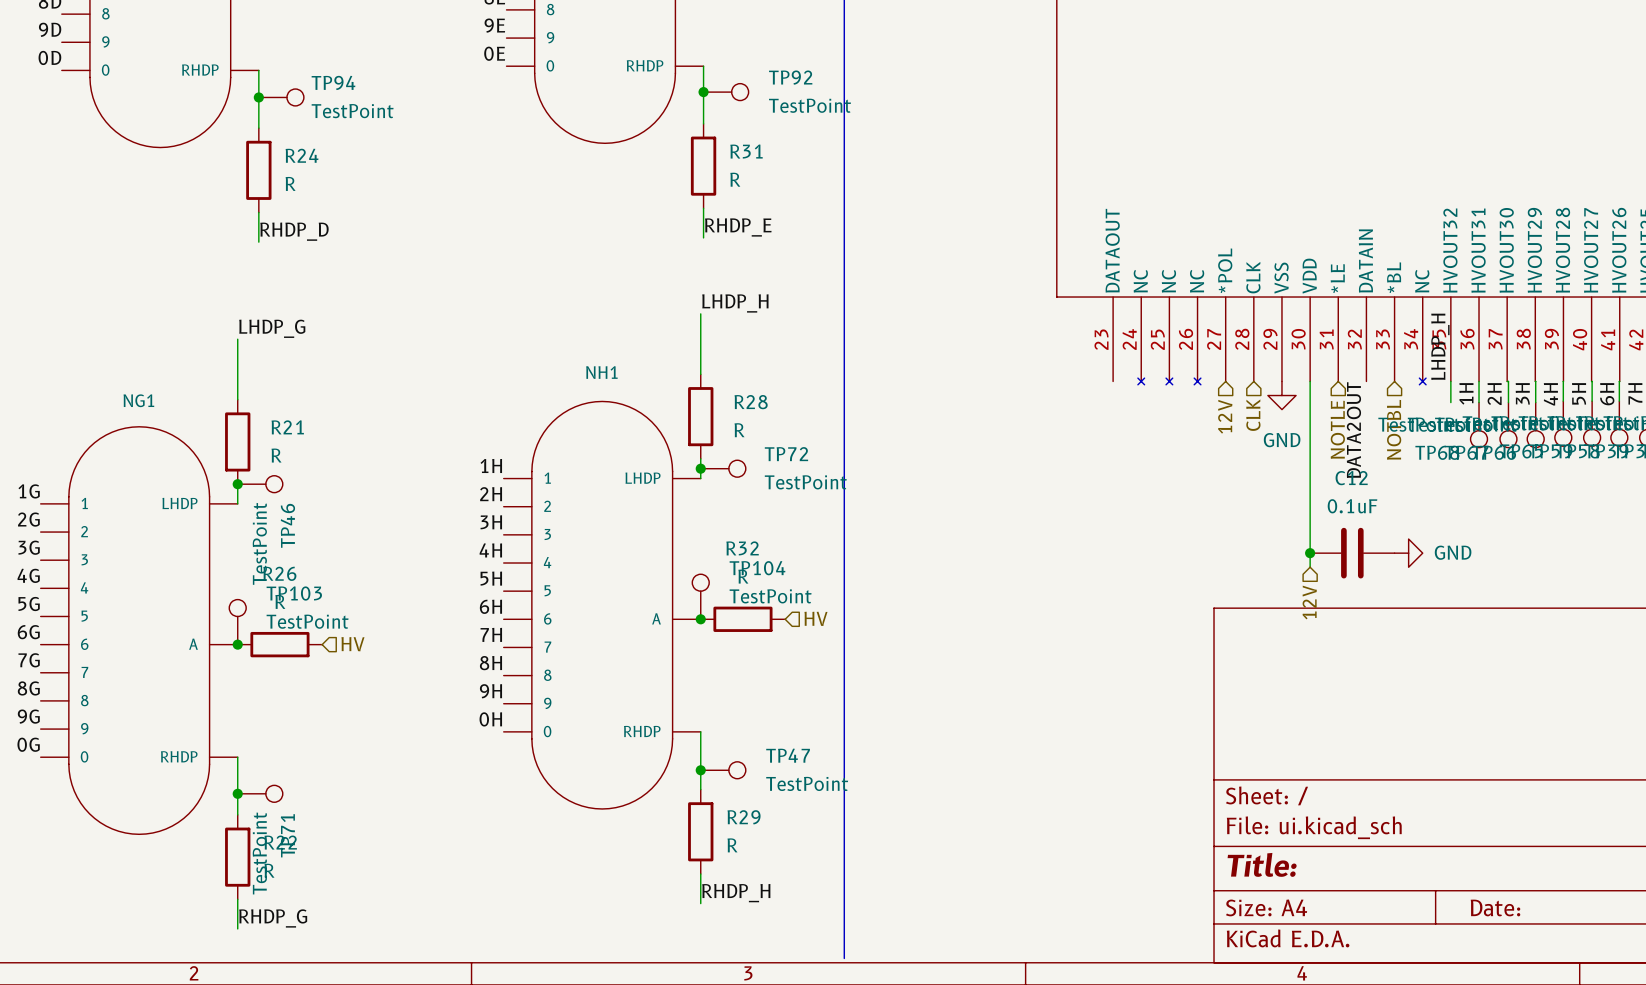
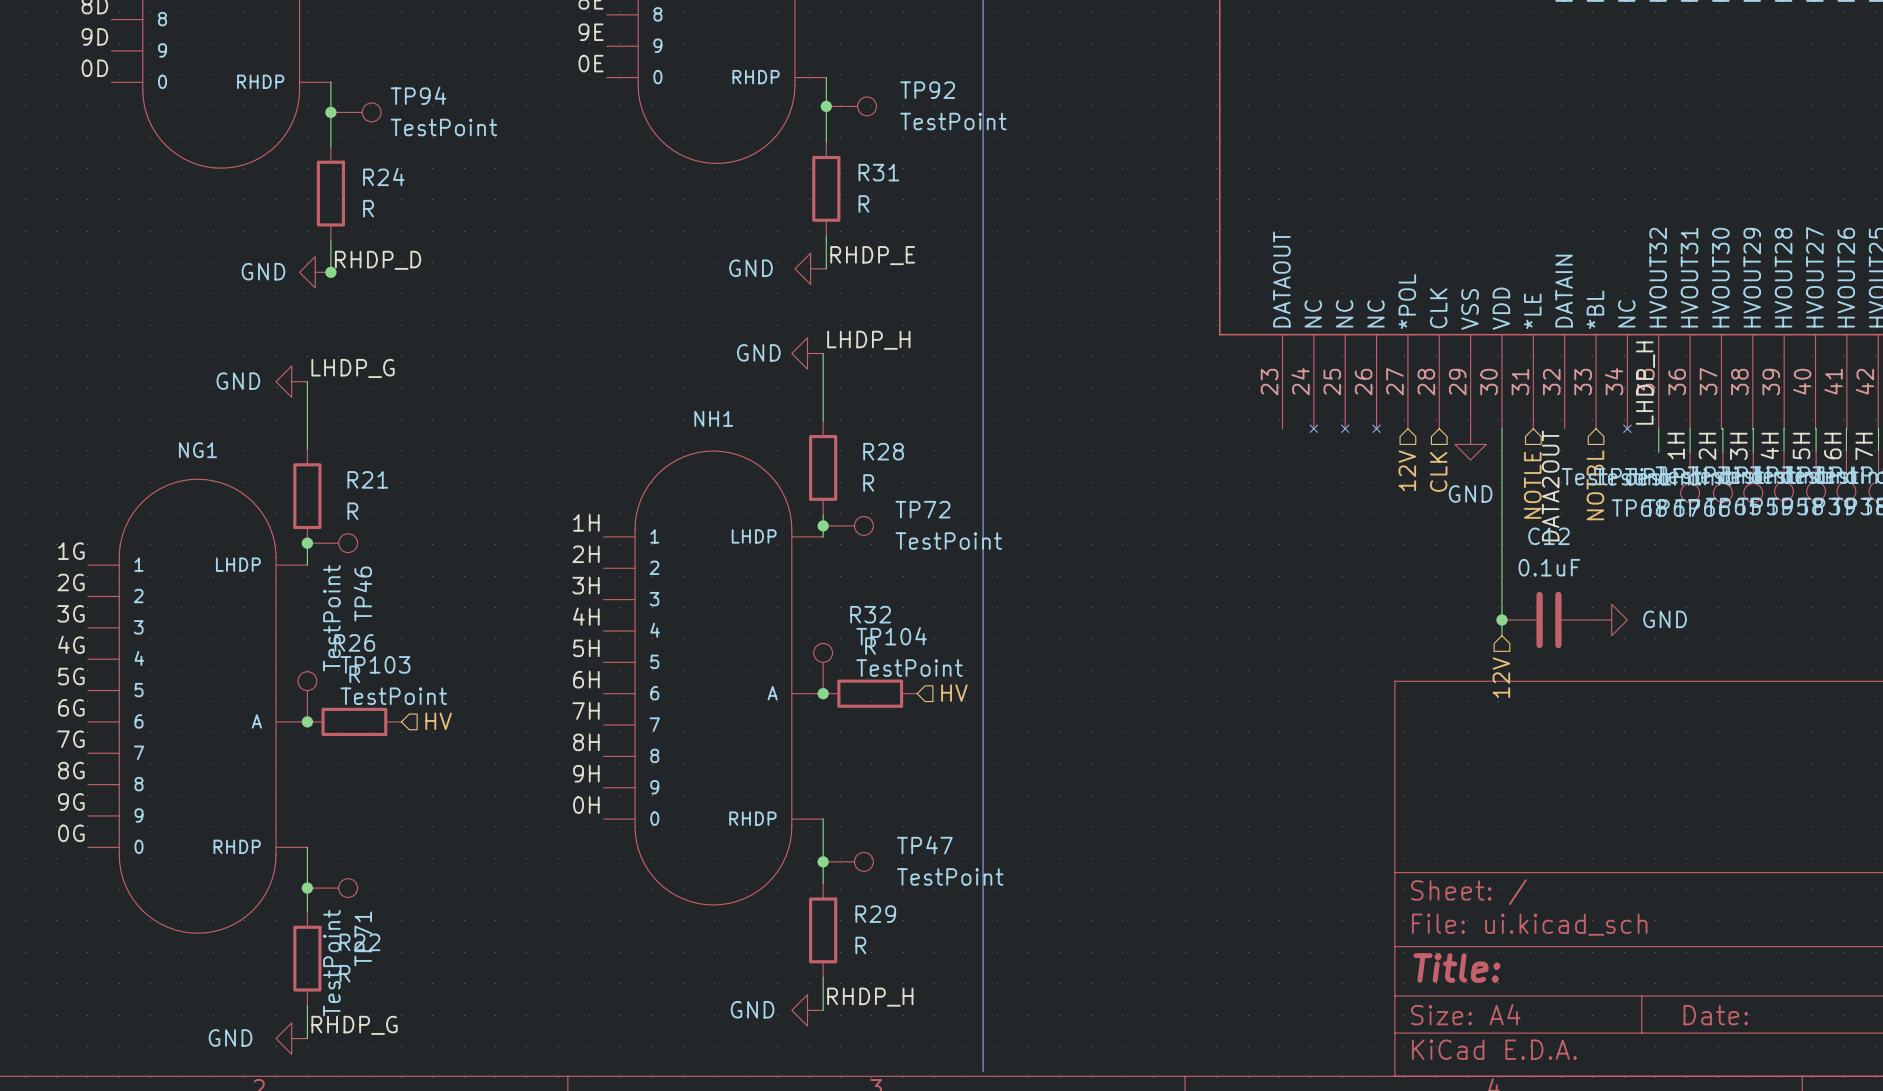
power symbol: none -> GND (810, 268)
power symbol: none -> GND (315, 272)
junction: none -> (330, 272)
power symbol: none -> GND (807, 353)
power symbol: none -> GND (291, 381)
power symbol: none -> GND (807, 1010)
power symbol: none -> GND (291, 1038)

